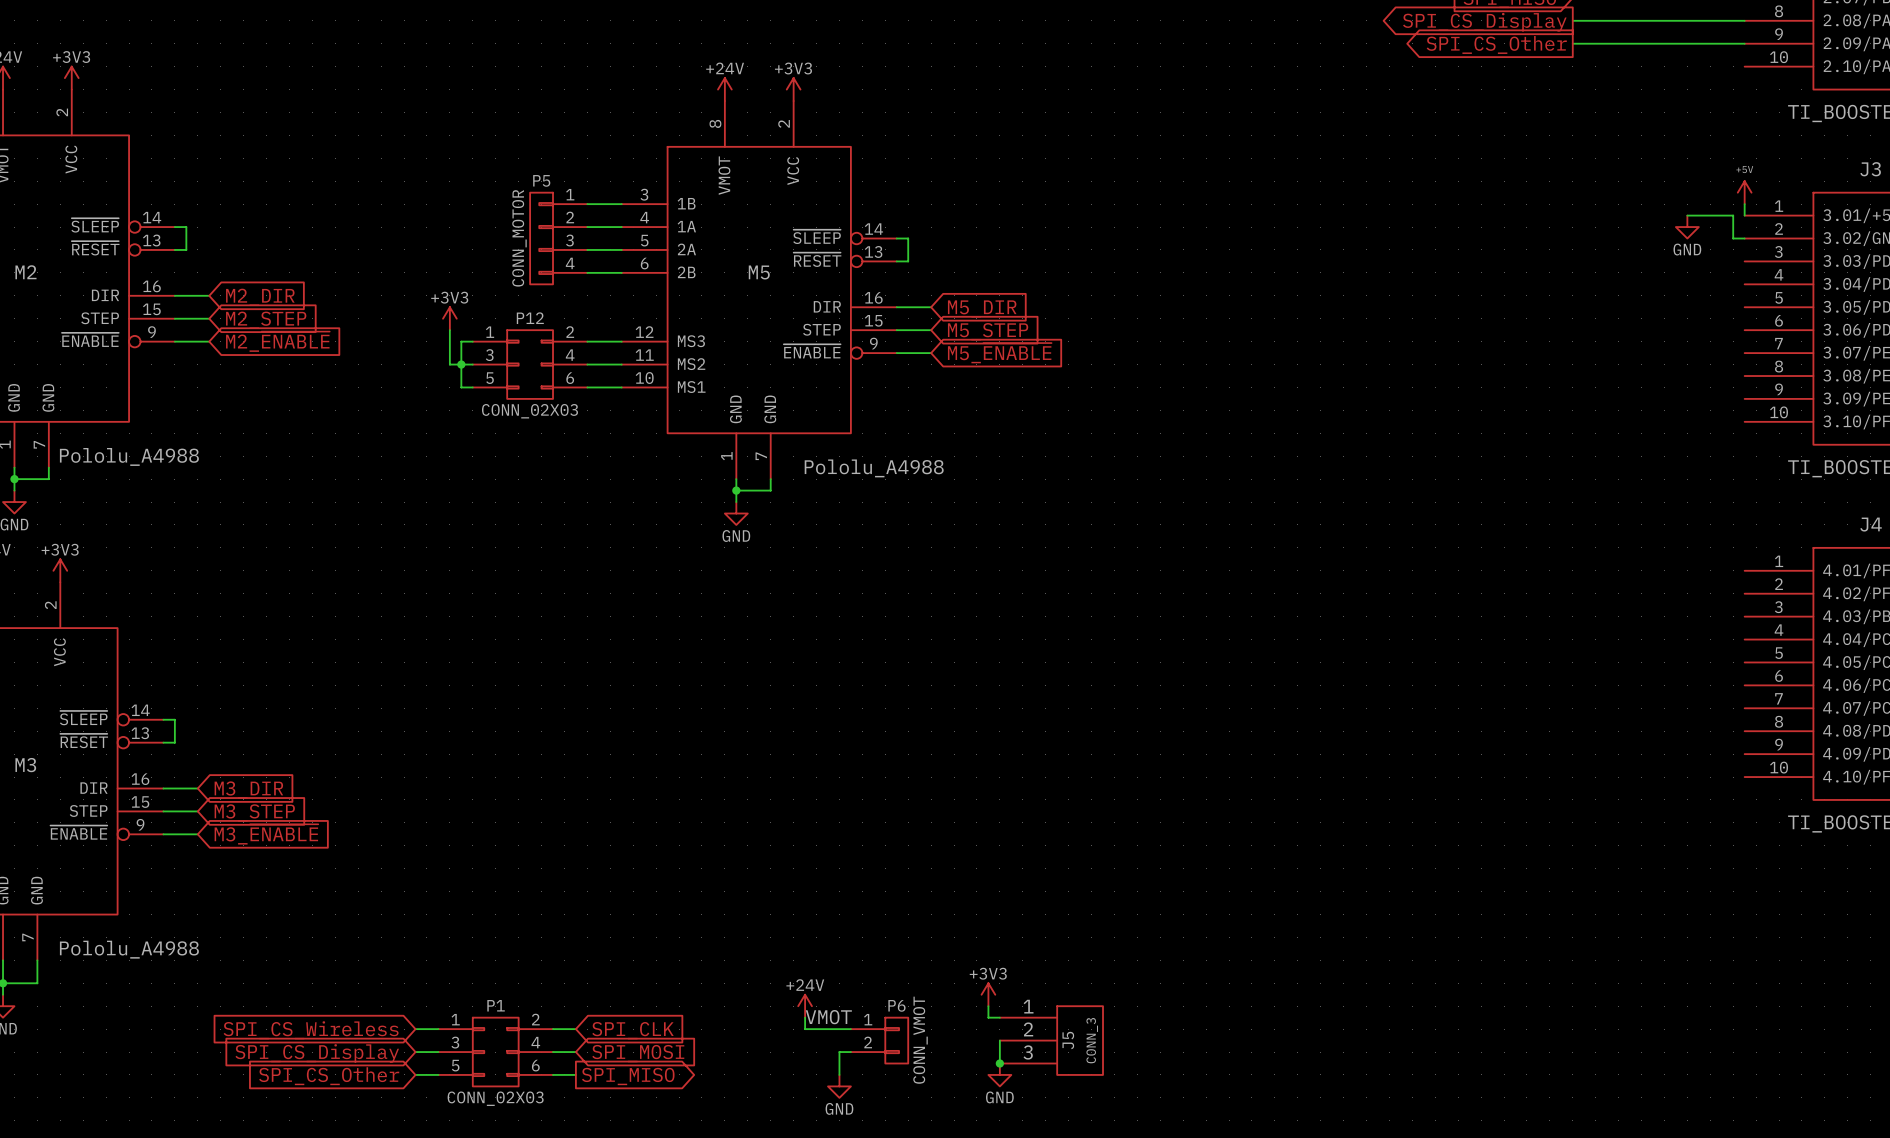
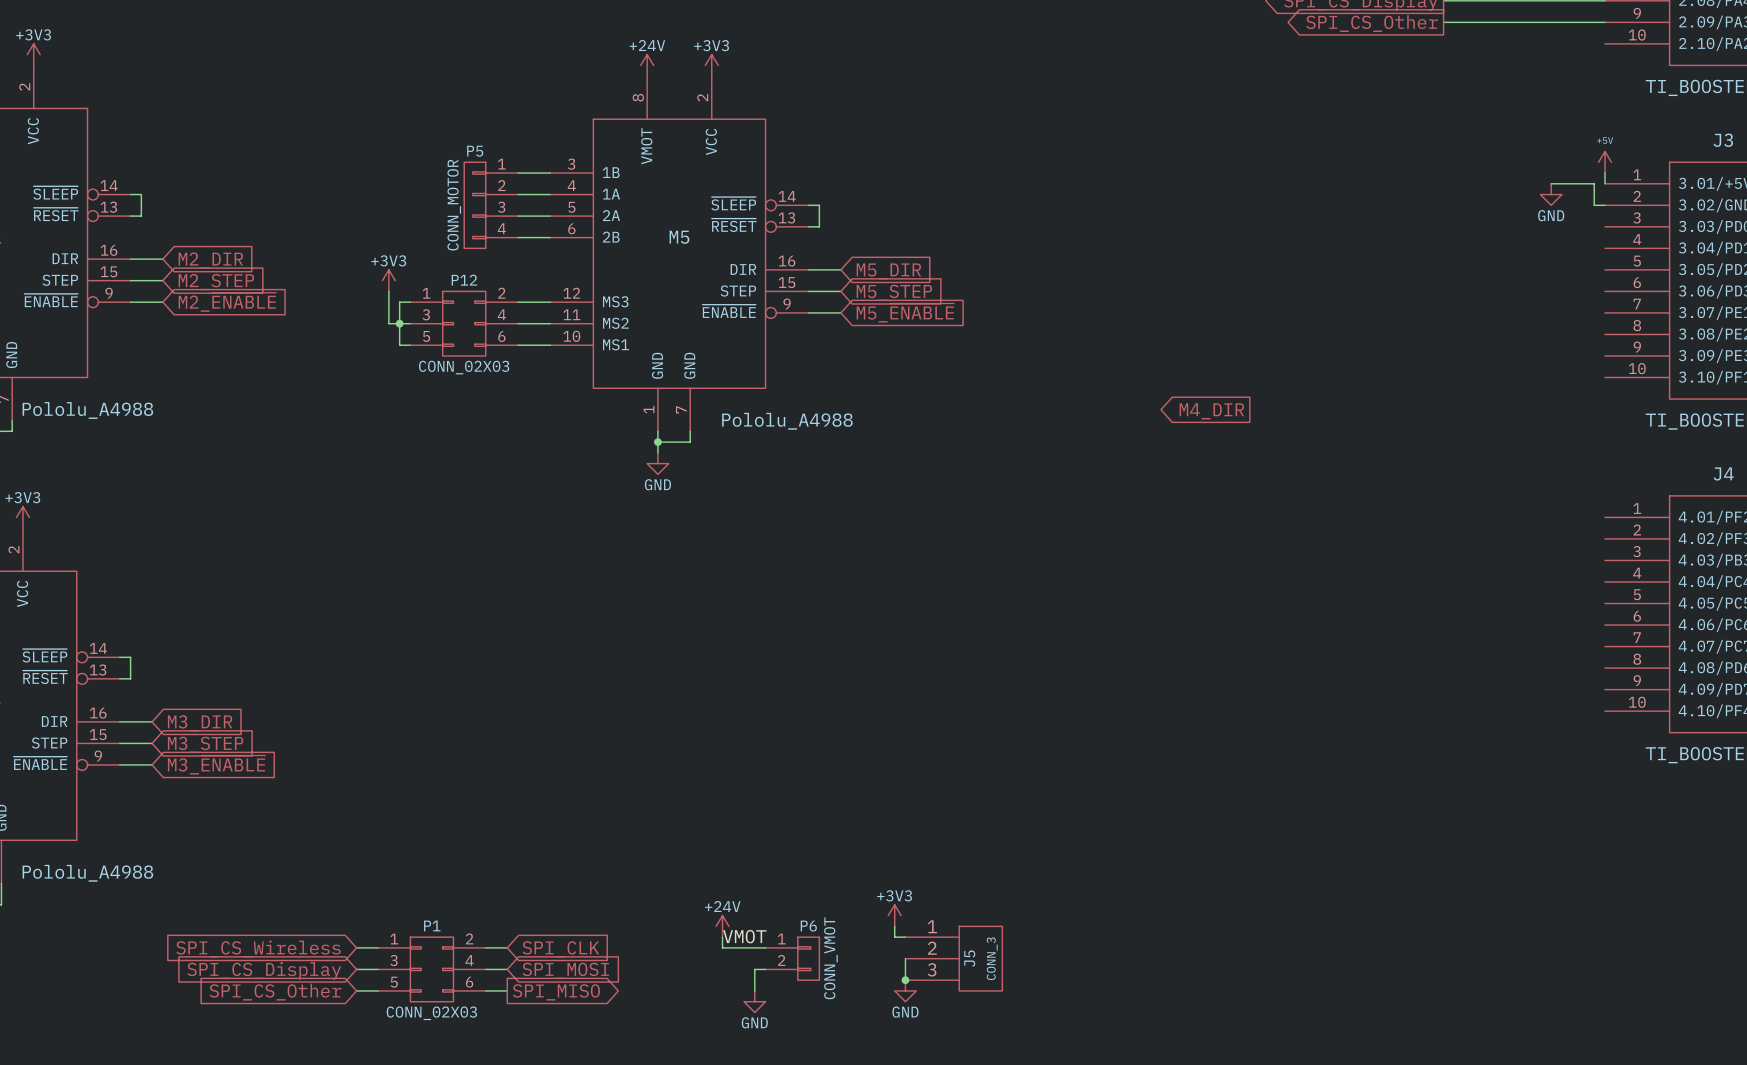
global label: none -> M4_DIR (1211, 411)

